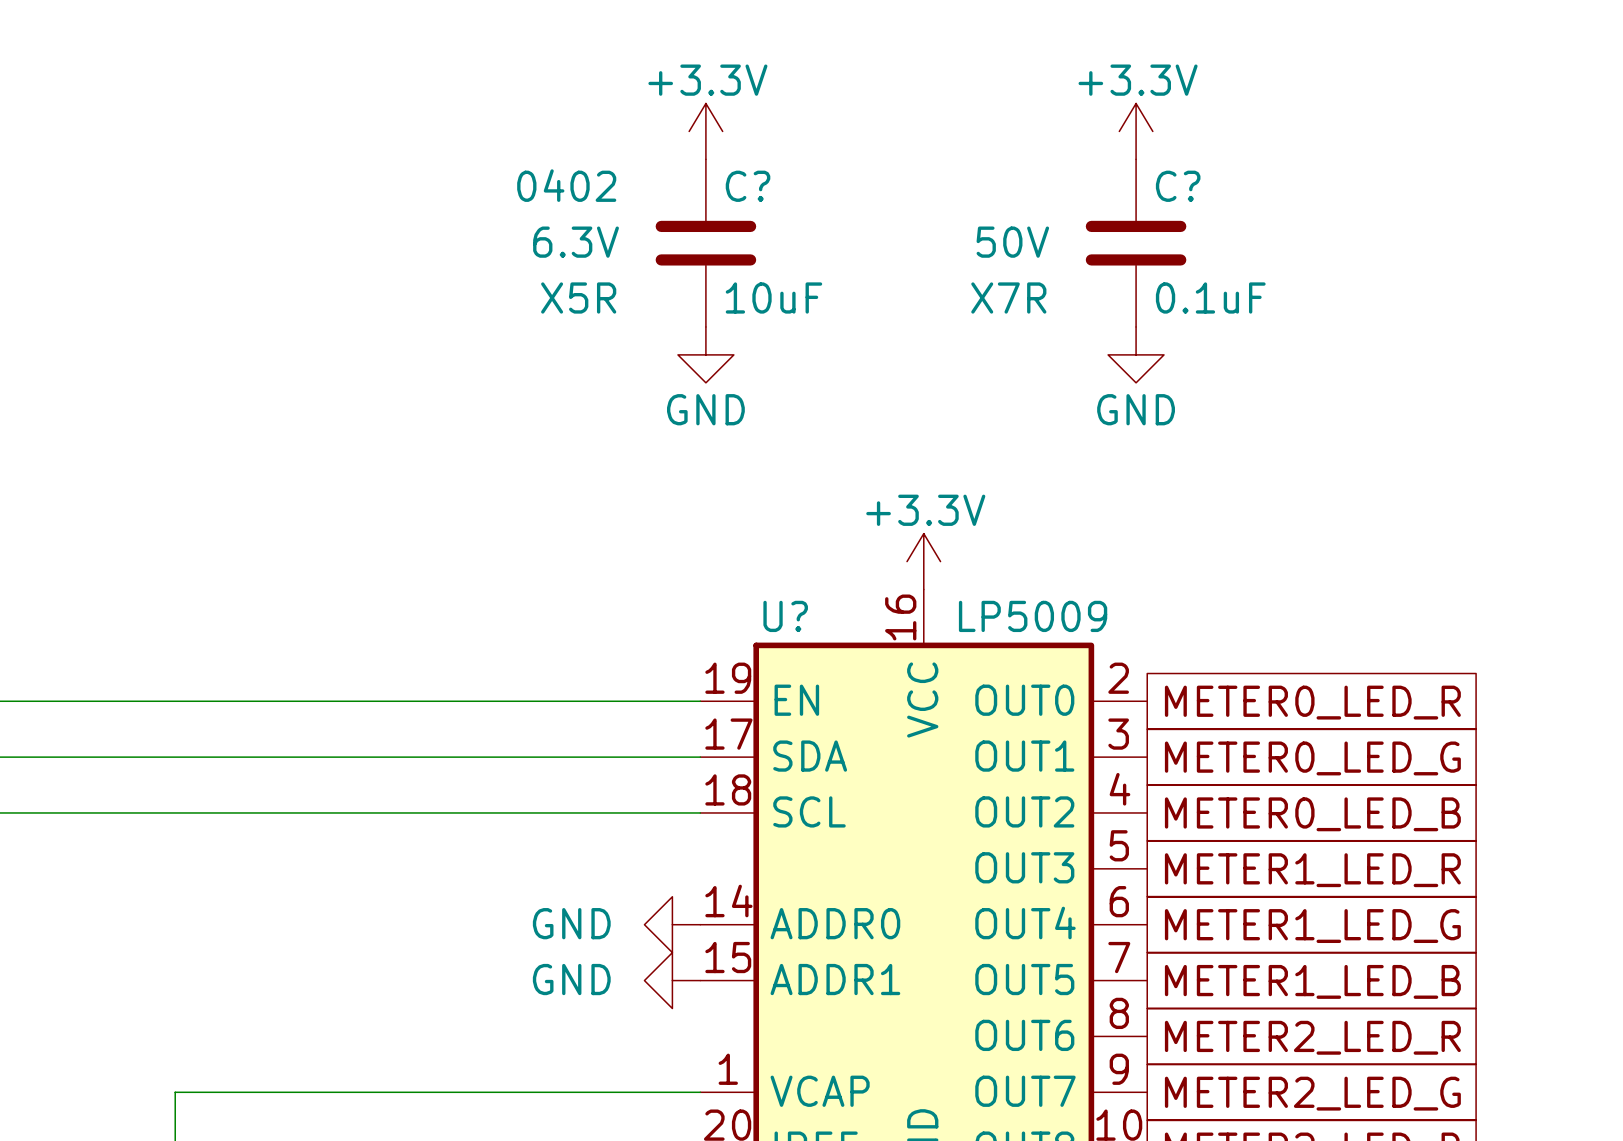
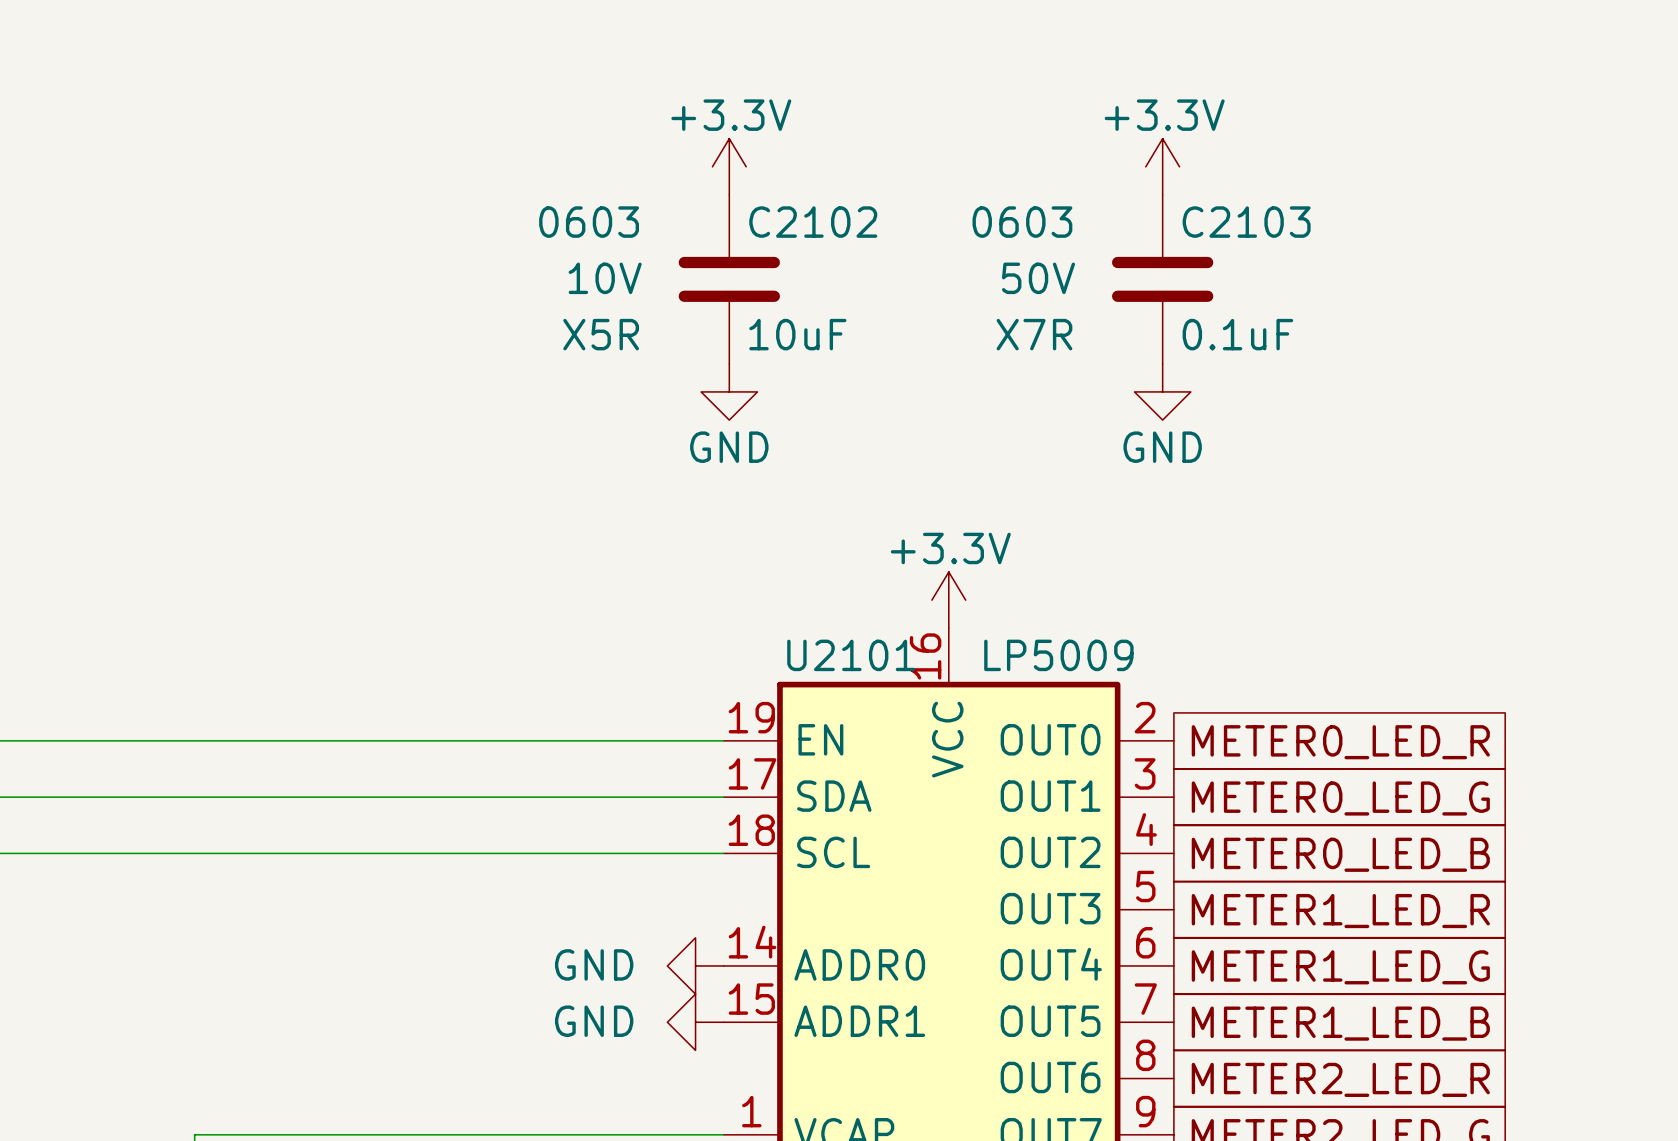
C? text: 0402 (566, 185) -> 0603 (589, 222)
C? name: C? (748, 186) -> C2102 (813, 222)
C? text: none -> 0603 (1022, 222)
C? name: C? (1178, 186) -> C2103 (1246, 222)
C? text: 6.3V (576, 242) -> 10V (605, 278)
U? name: U? (785, 616) -> U2101 (851, 655)

